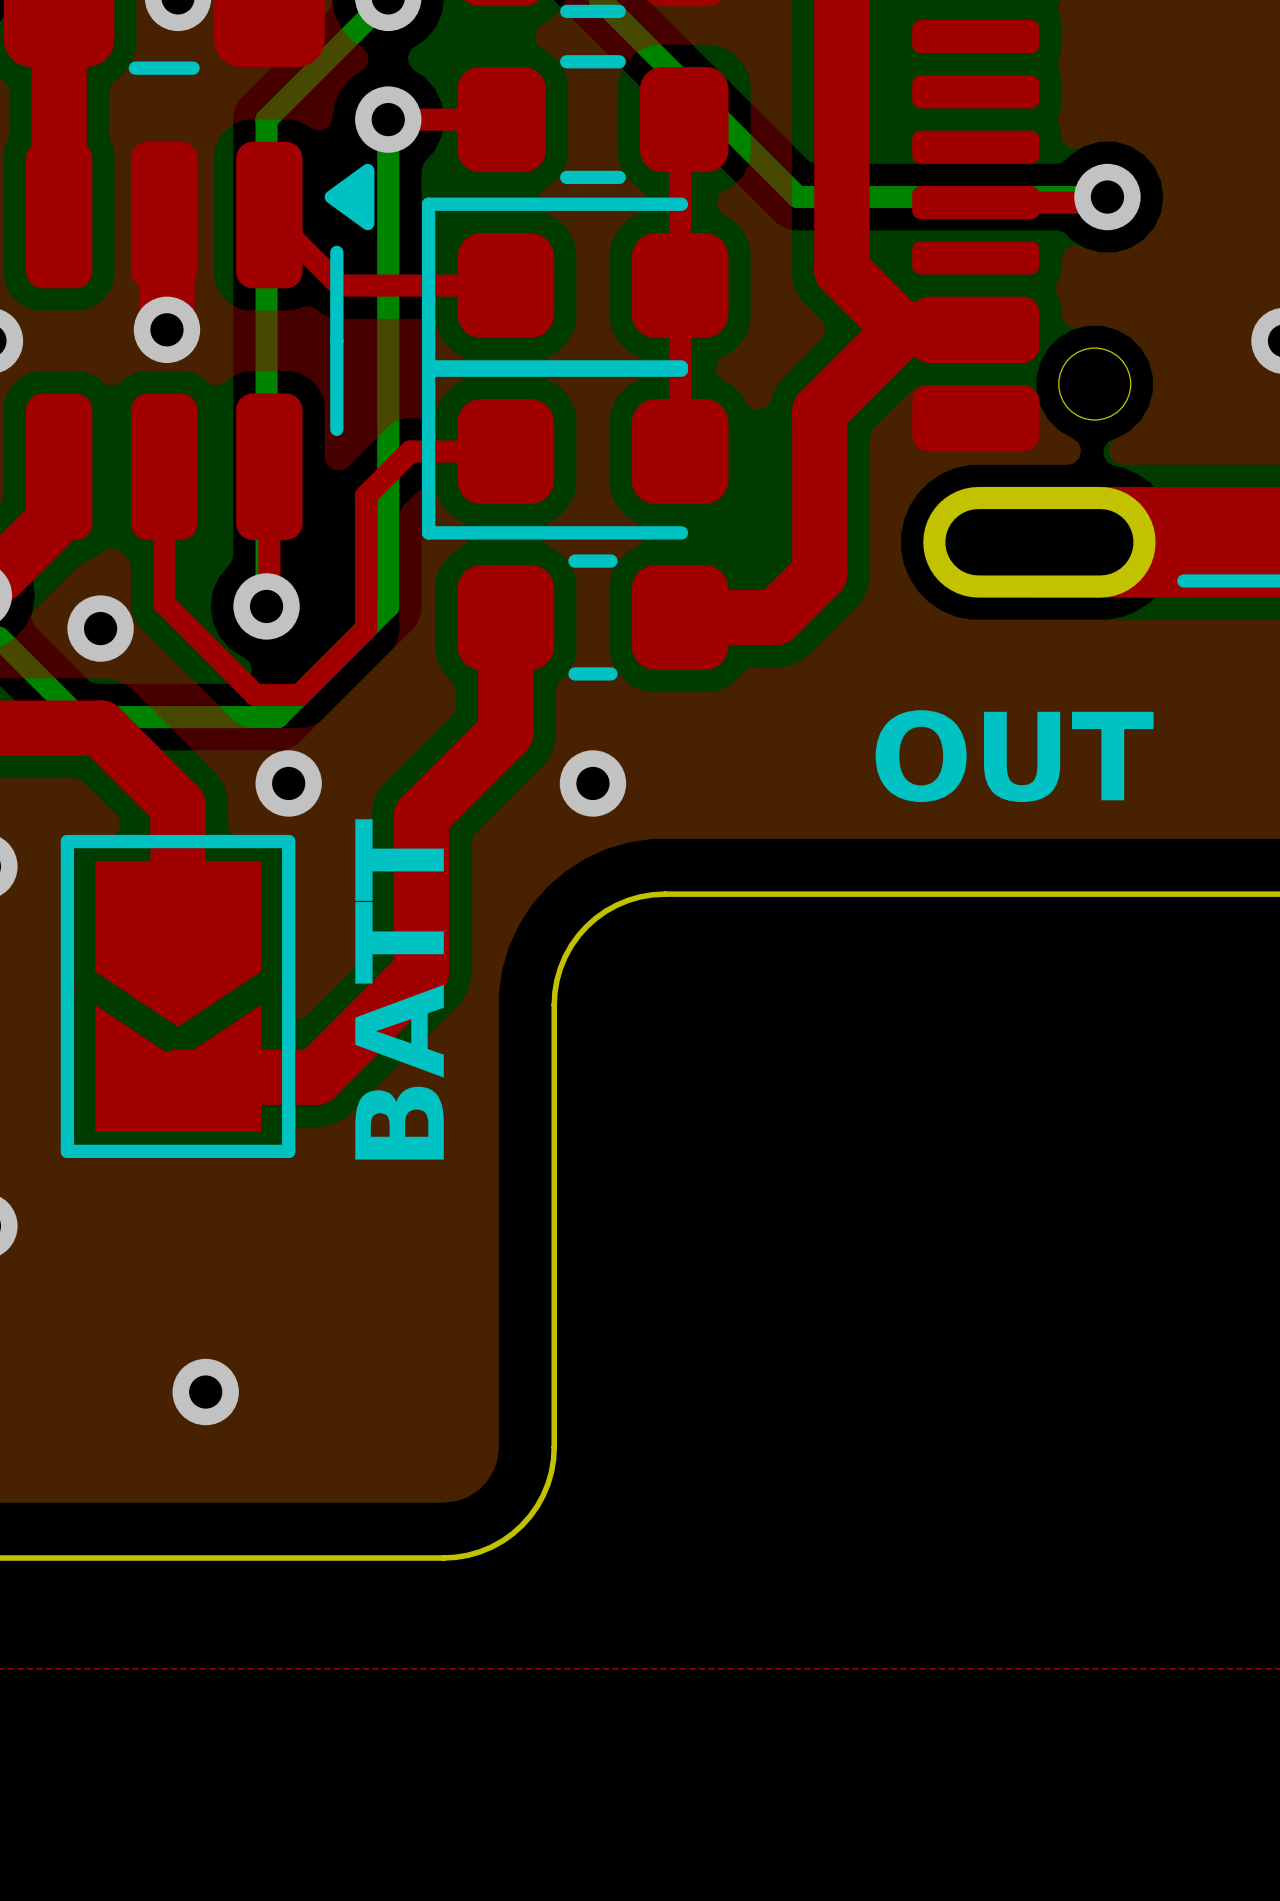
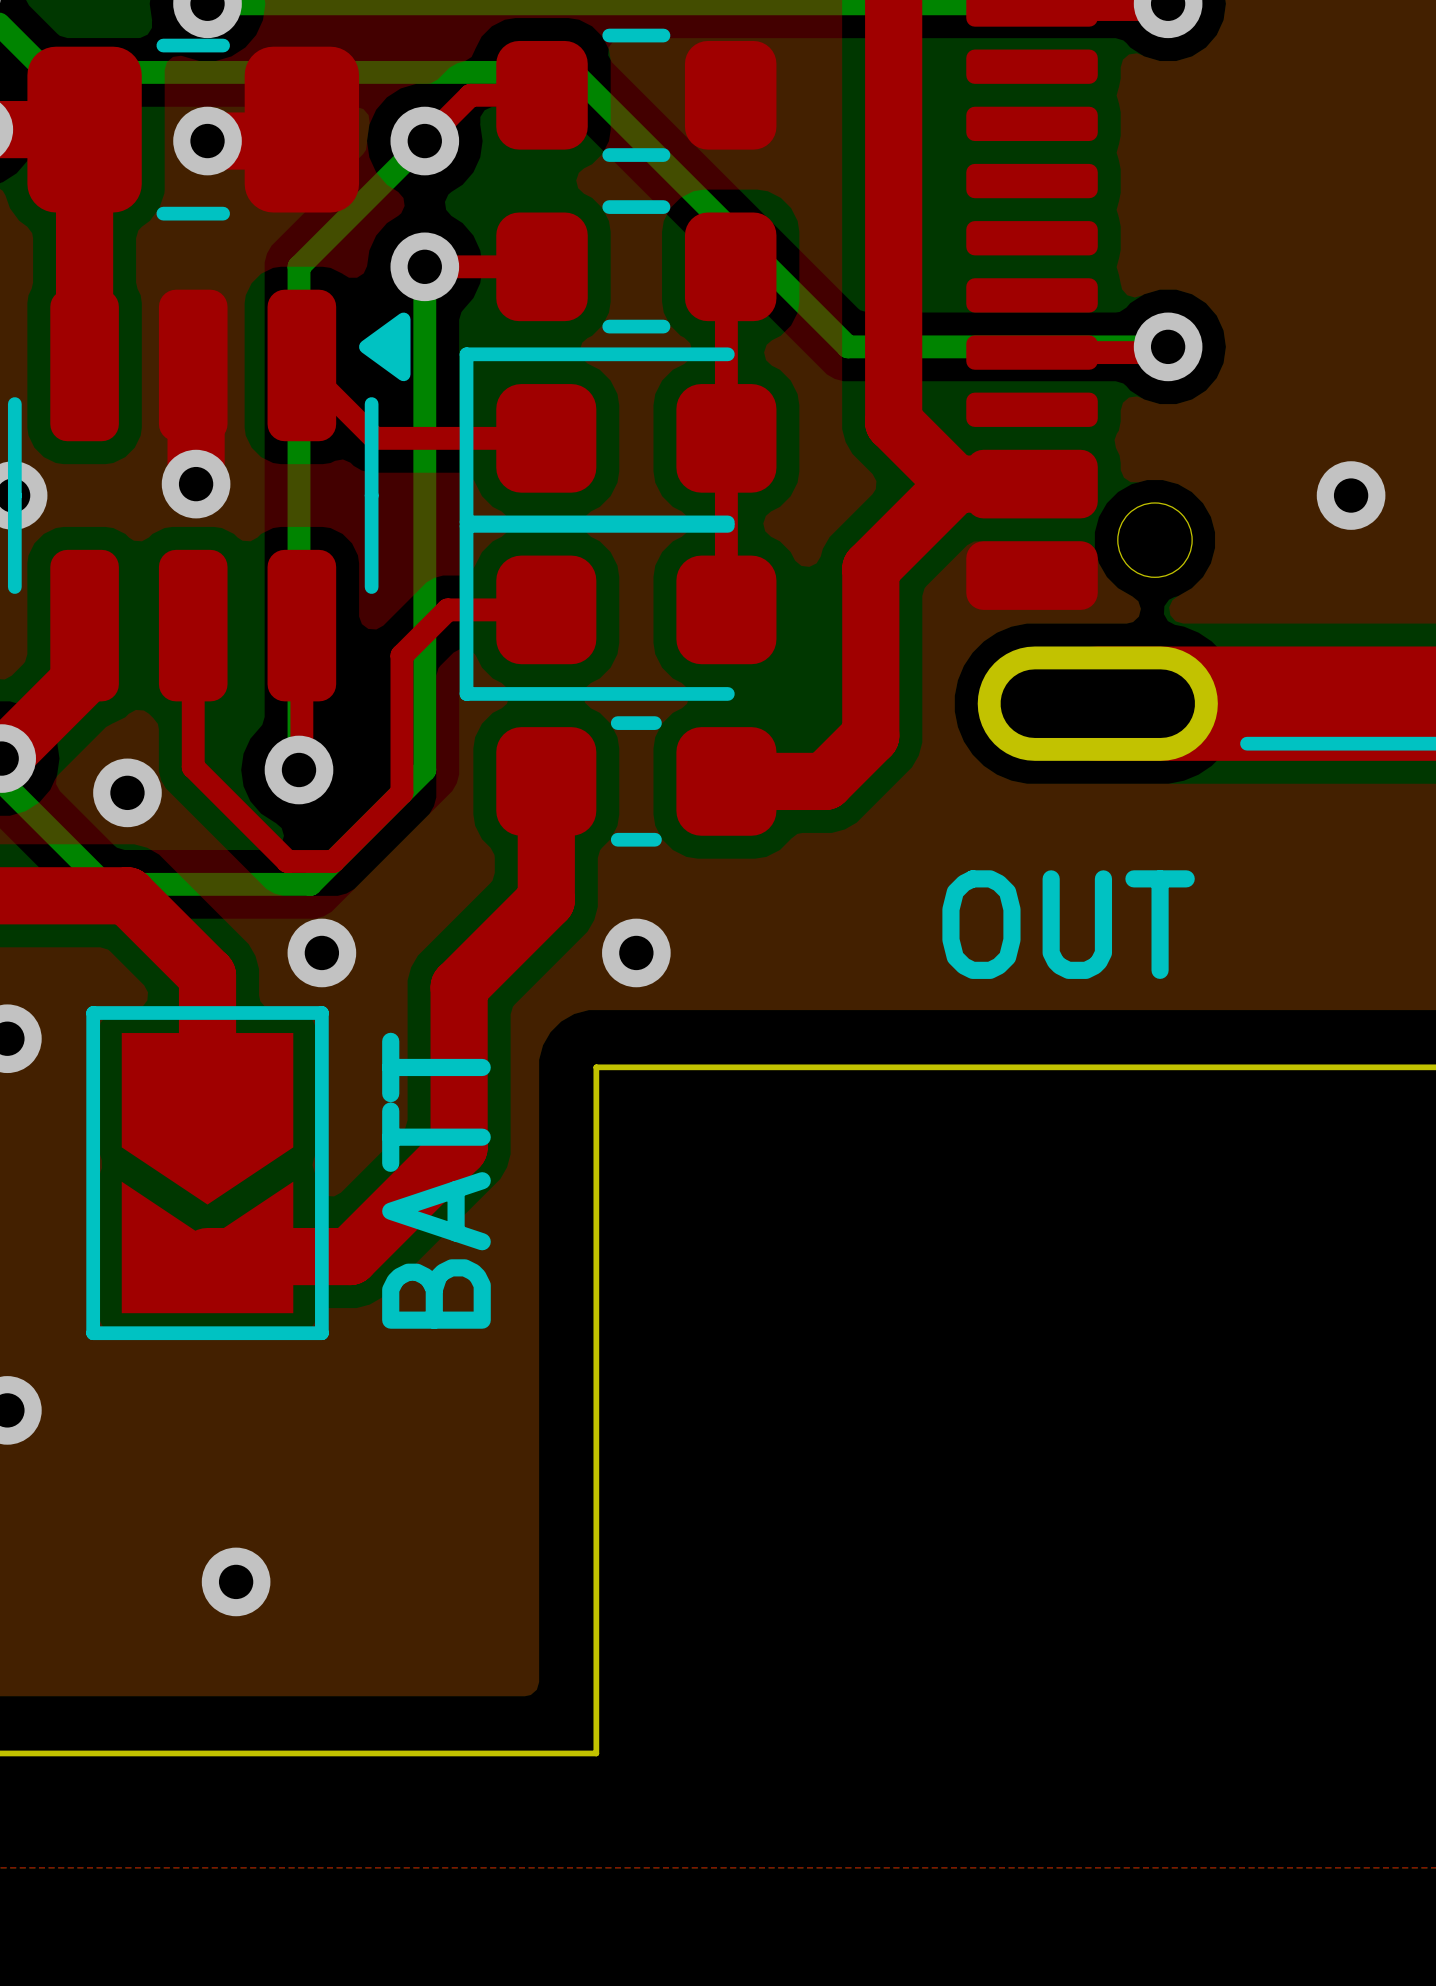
board edge: (664, 894) (628, 900) (606, 911) (586, 926) (571, 945) (560, 968) (554, 1004) -> (710, 1067) (596, 1067) (596, 1181)
board edge: (554, 1447) (551, 1471) (543, 1495) (521, 1525) (491, 1547) (468, 1555) (443, 1558) -> (596, 1639) (596, 1753) (481, 1753)

